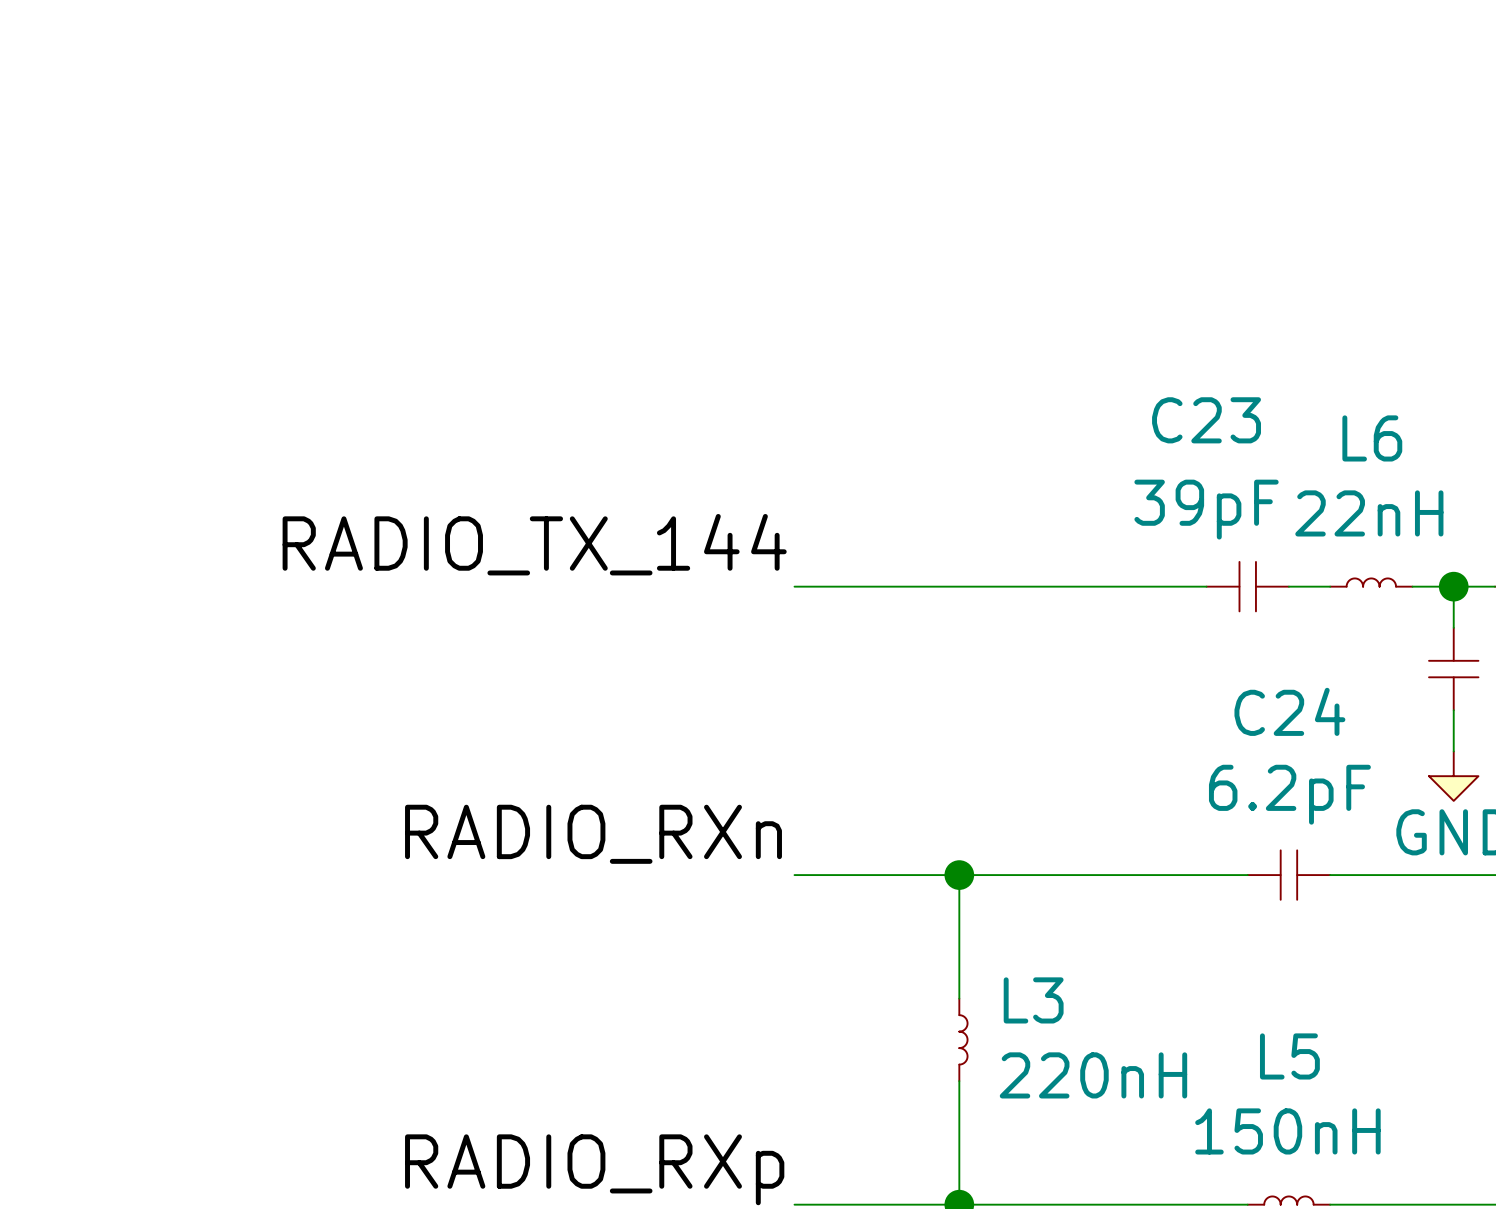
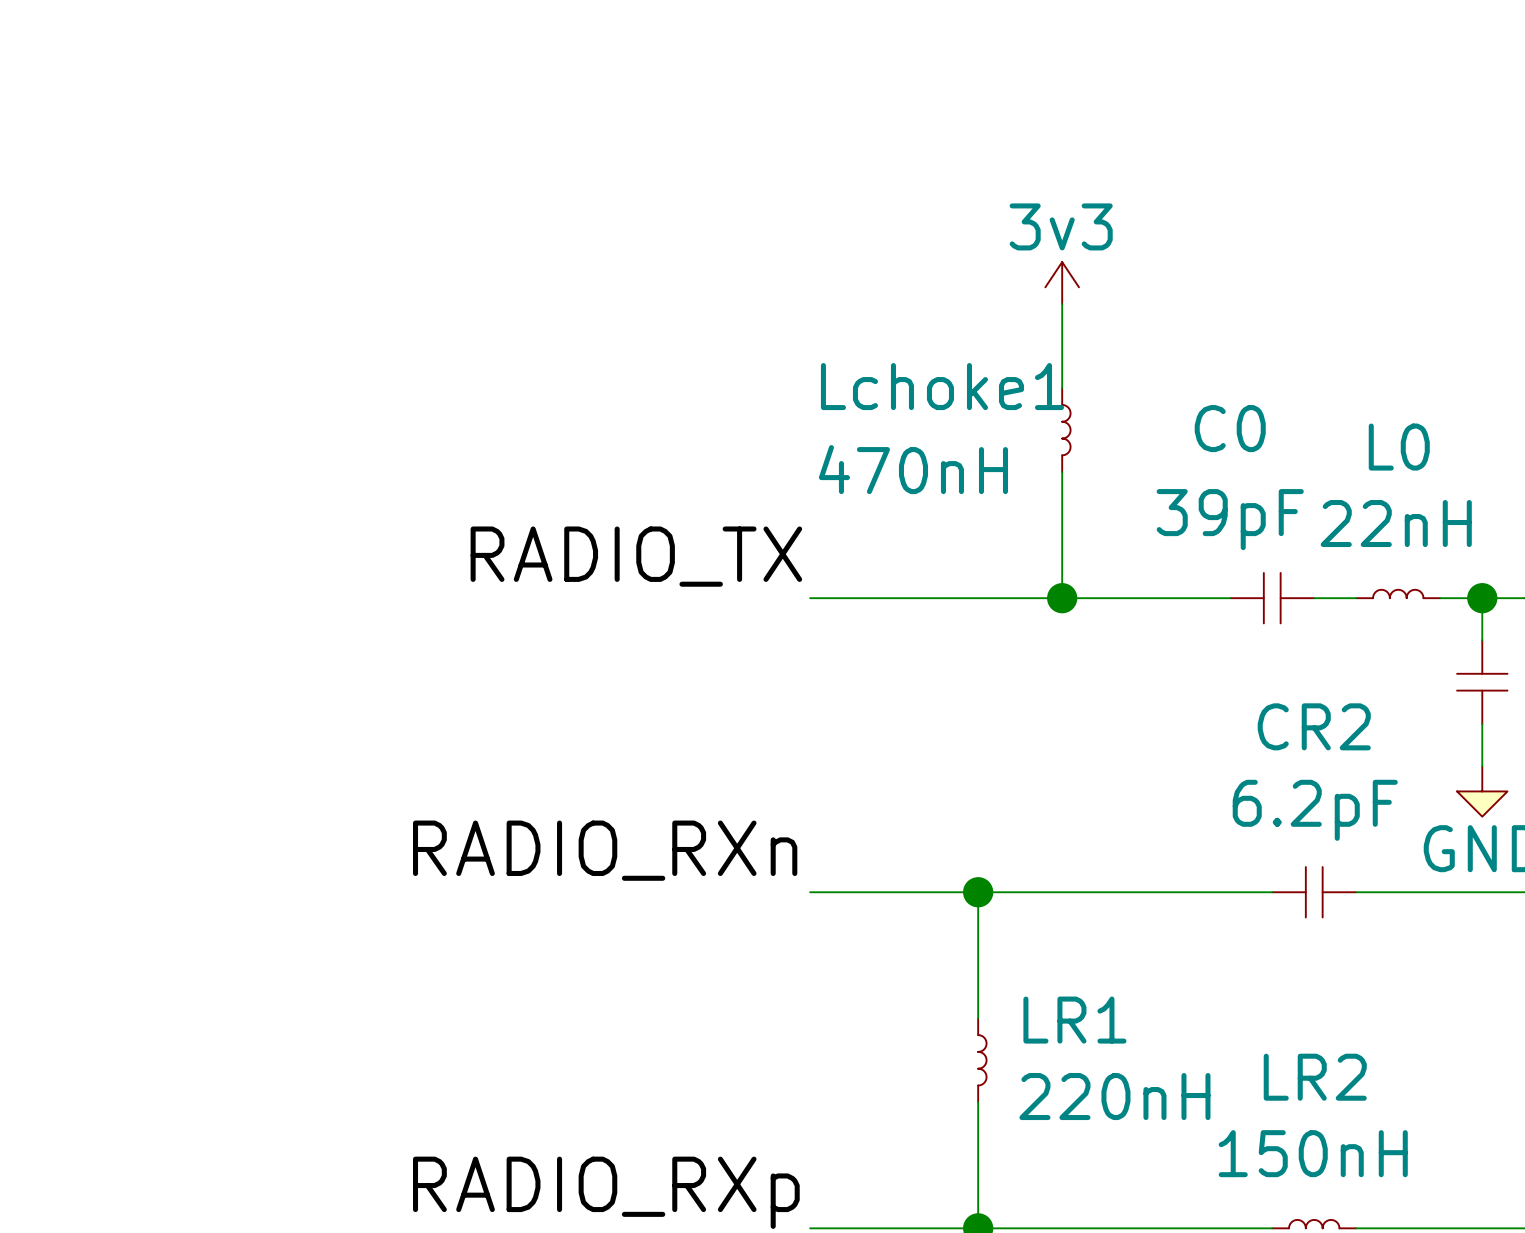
power symbol: none -> 3v3 (1062, 283)
wire: none -> (1062, 304) (1062, 388)
C23 name: C23 (1206, 420) -> C0 (1230, 428)
Lchoke1: none -> 470nH (1066, 430)
L6 name: L6 (1372, 438) -> L0 (1399, 447)
wire: none -> (1062, 472) (1062, 598)
label: RADIO_TX_144 (534, 544) -> RADIO_TX (636, 556)
junction: none -> (1062, 598)
C24 name: C24 (1289, 711) -> CR2 (1314, 726)
L3 name: L3 (1033, 1000) -> LR1 (1074, 1020)
L5 name: L5 (1289, 1056) -> LR2 (1315, 1077)

